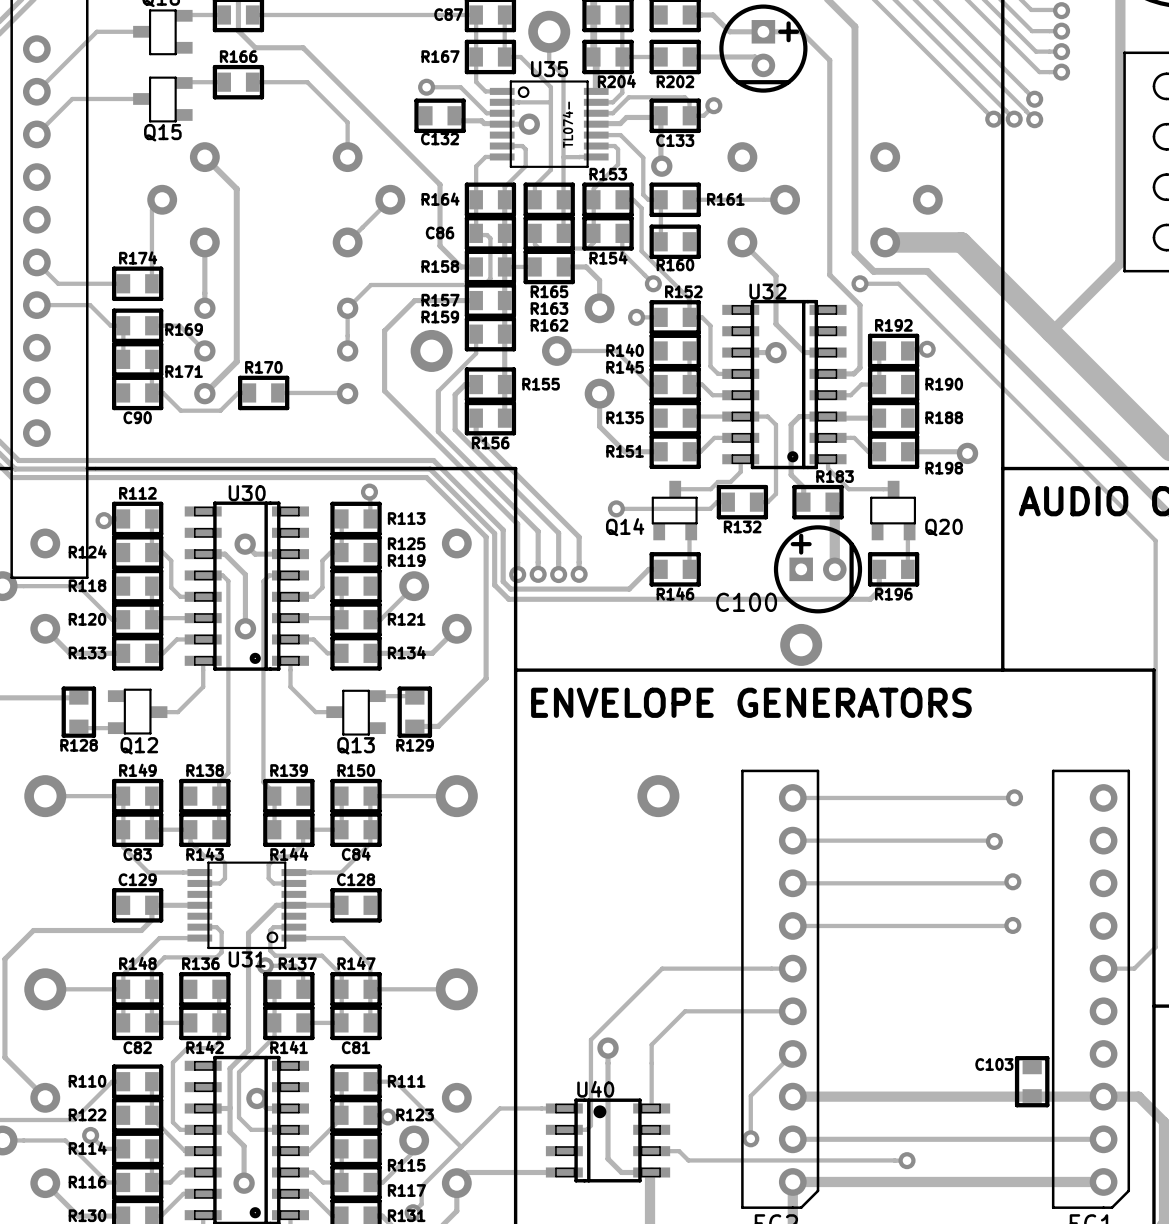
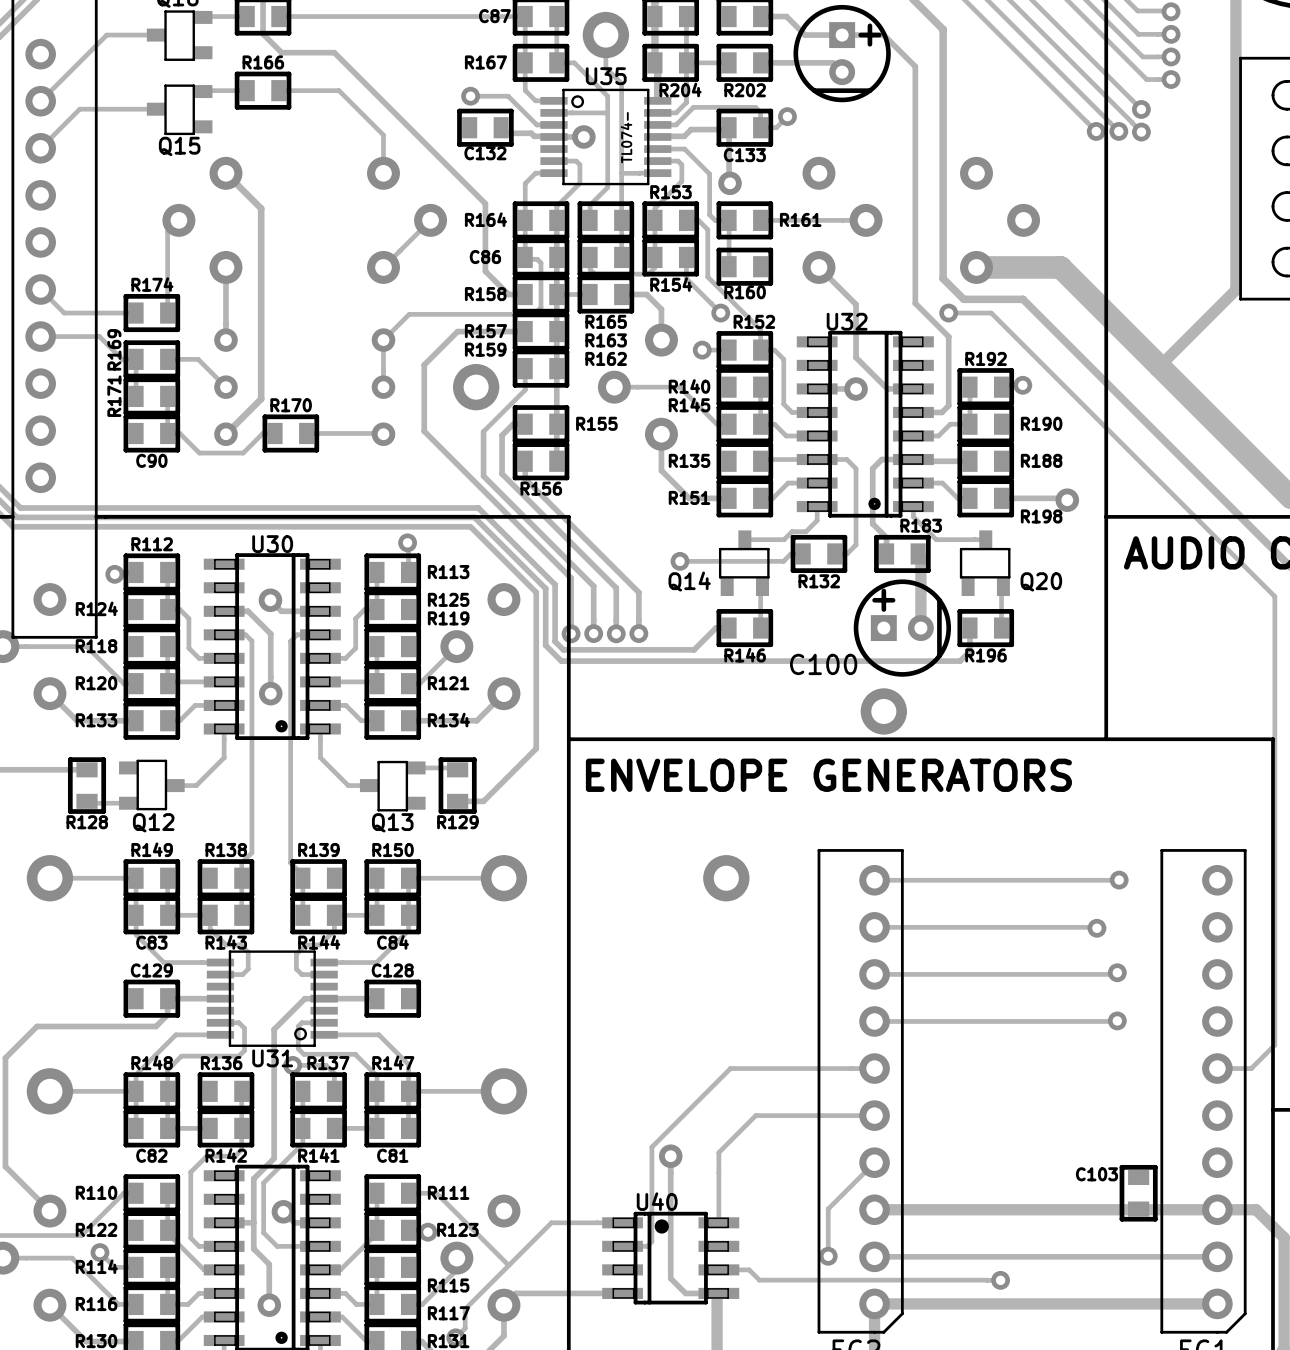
R169 name rotation: 0° (184, 329) -> 90° counterclockwise (114, 349)
R169 name position: R169 (184, 329) -> R169 (114, 349)
R171 name rotation: 0° (184, 371) -> 90° counterclockwise (114, 396)
R171 name position: R171 (184, 371) -> R171 (114, 396)

